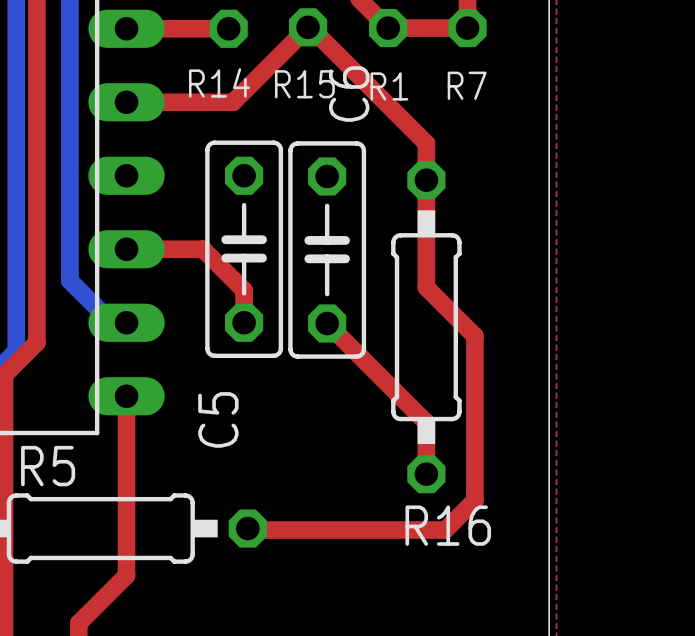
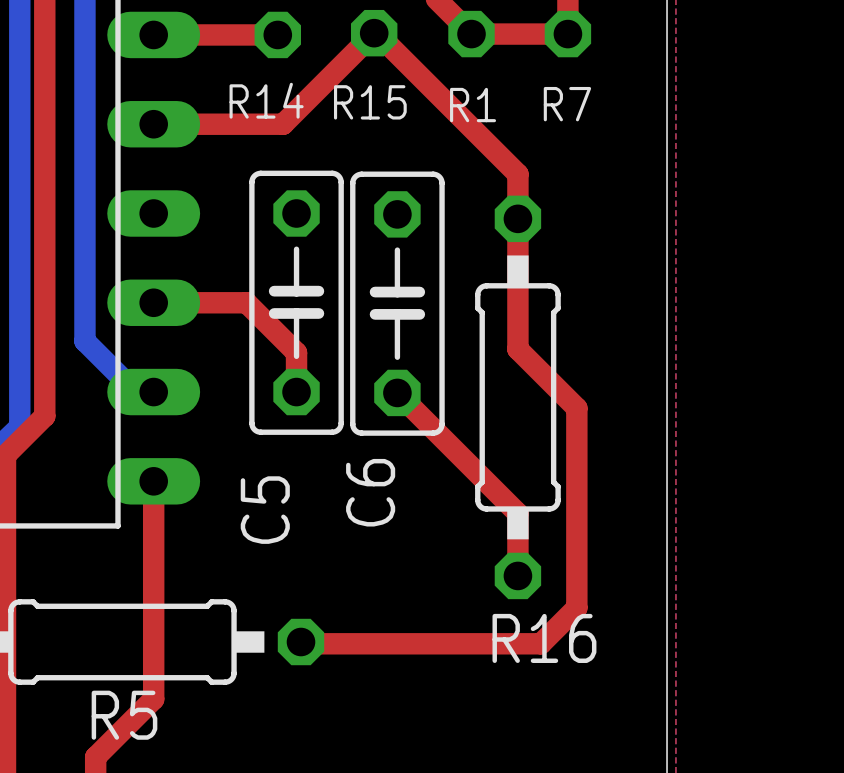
C6 name position: C6 (349, 94) -> C6 (370, 492)
R5 name position: R5 (48, 466) -> R5 (124, 715)

